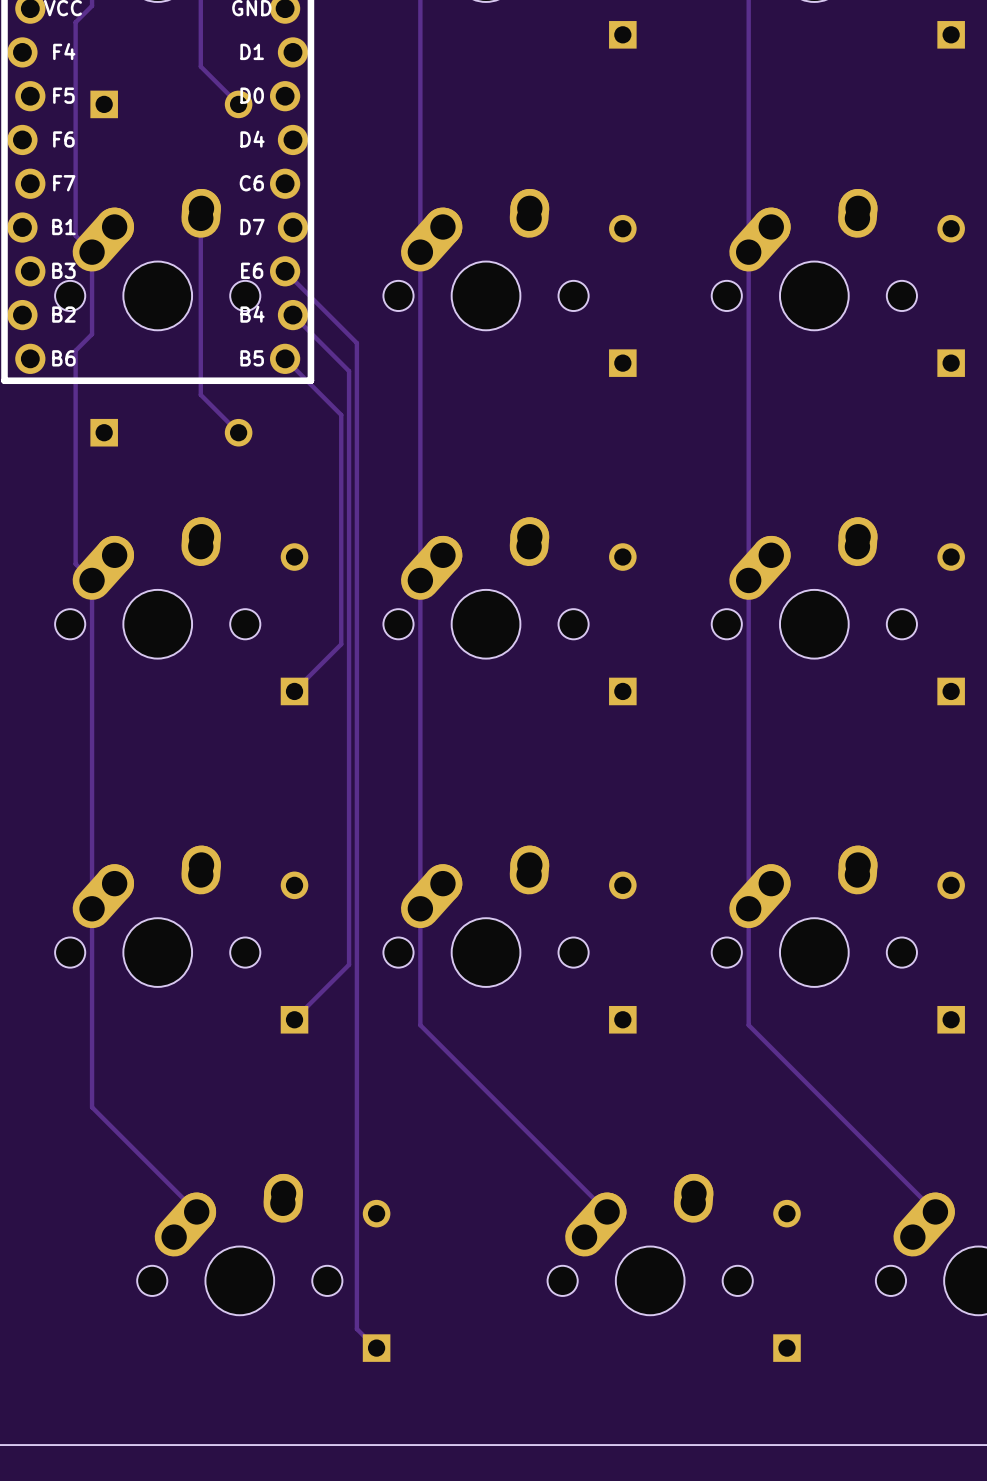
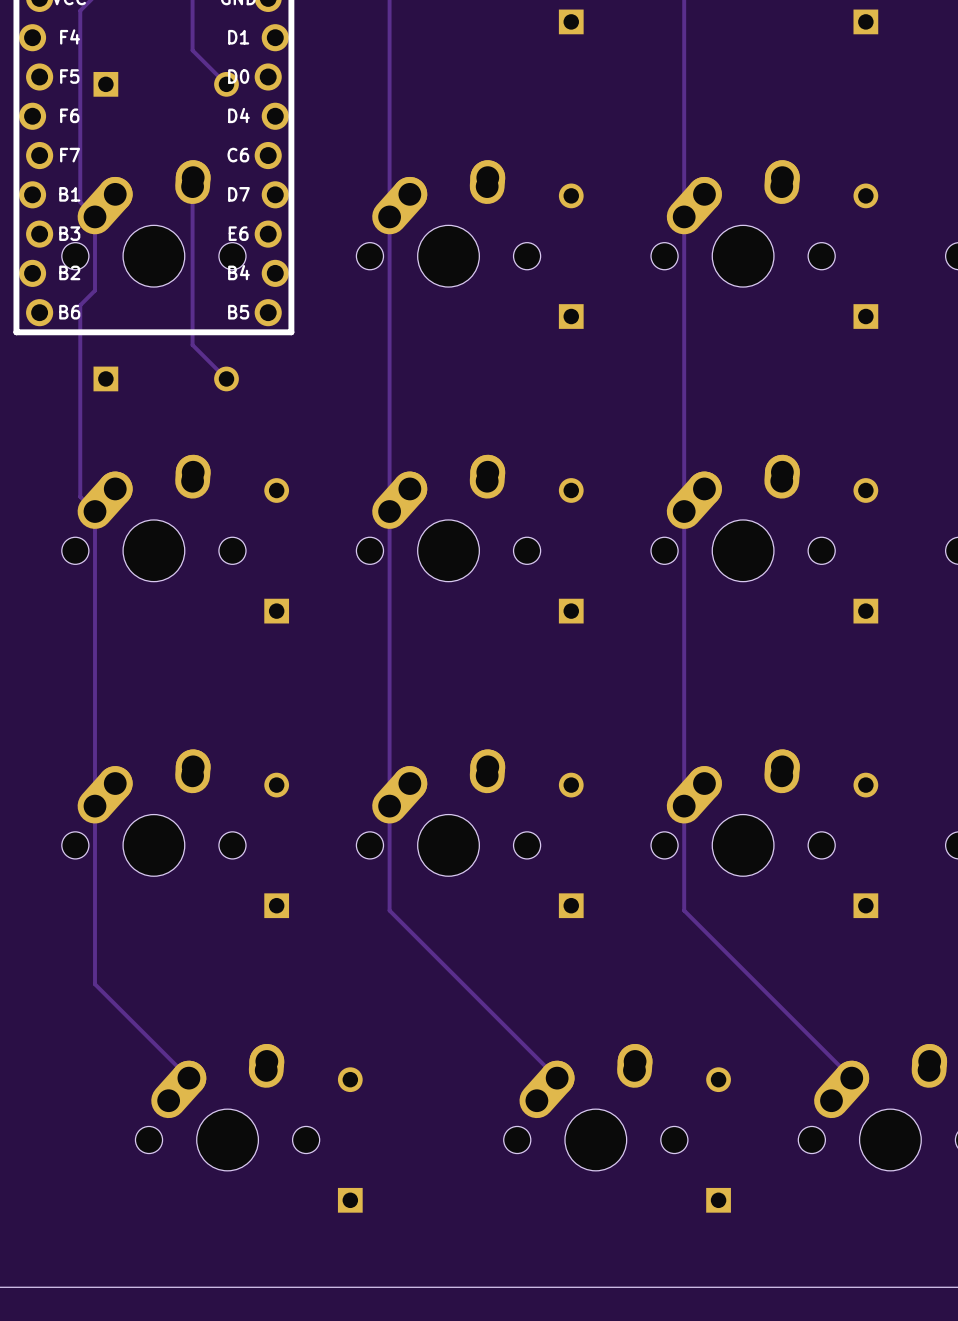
track: (285, 271) (356, 343) (356, 1329) (376, 1348) -> none
track: (292, 315) (349, 371) (349, 964) (294, 1019) -> none
track: (285, 358) (341, 414) (341, 644) (294, 691) -> none

